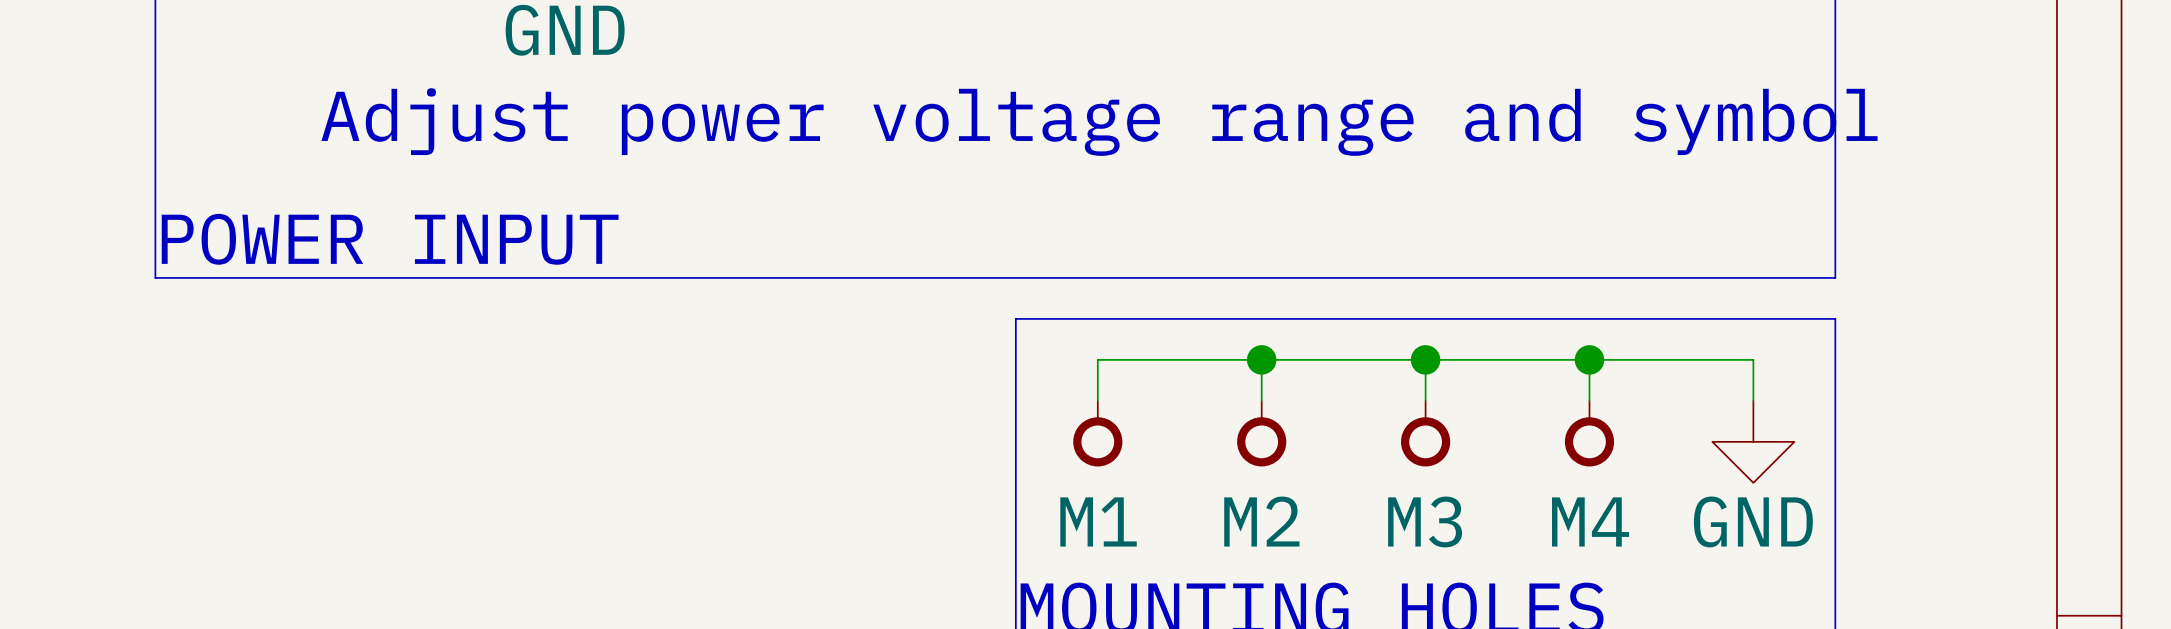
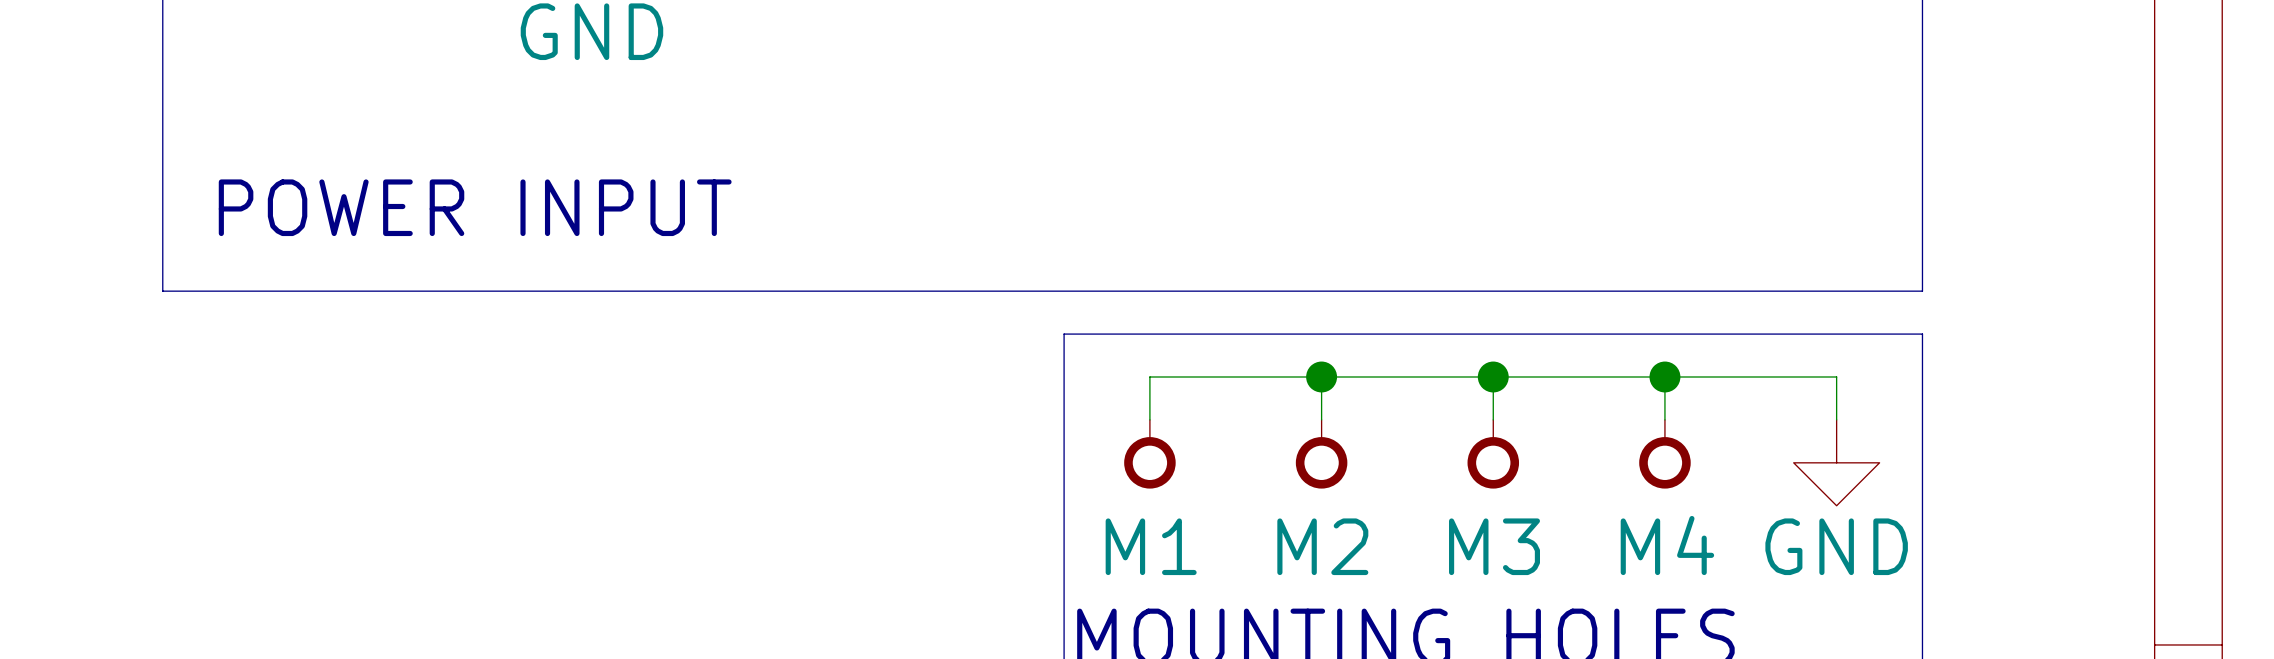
text: Adjust power voltage range and symbol (1099, 122) -> none
text position: POWER INPUT (390, 239) -> POWER INPUT (475, 207)

